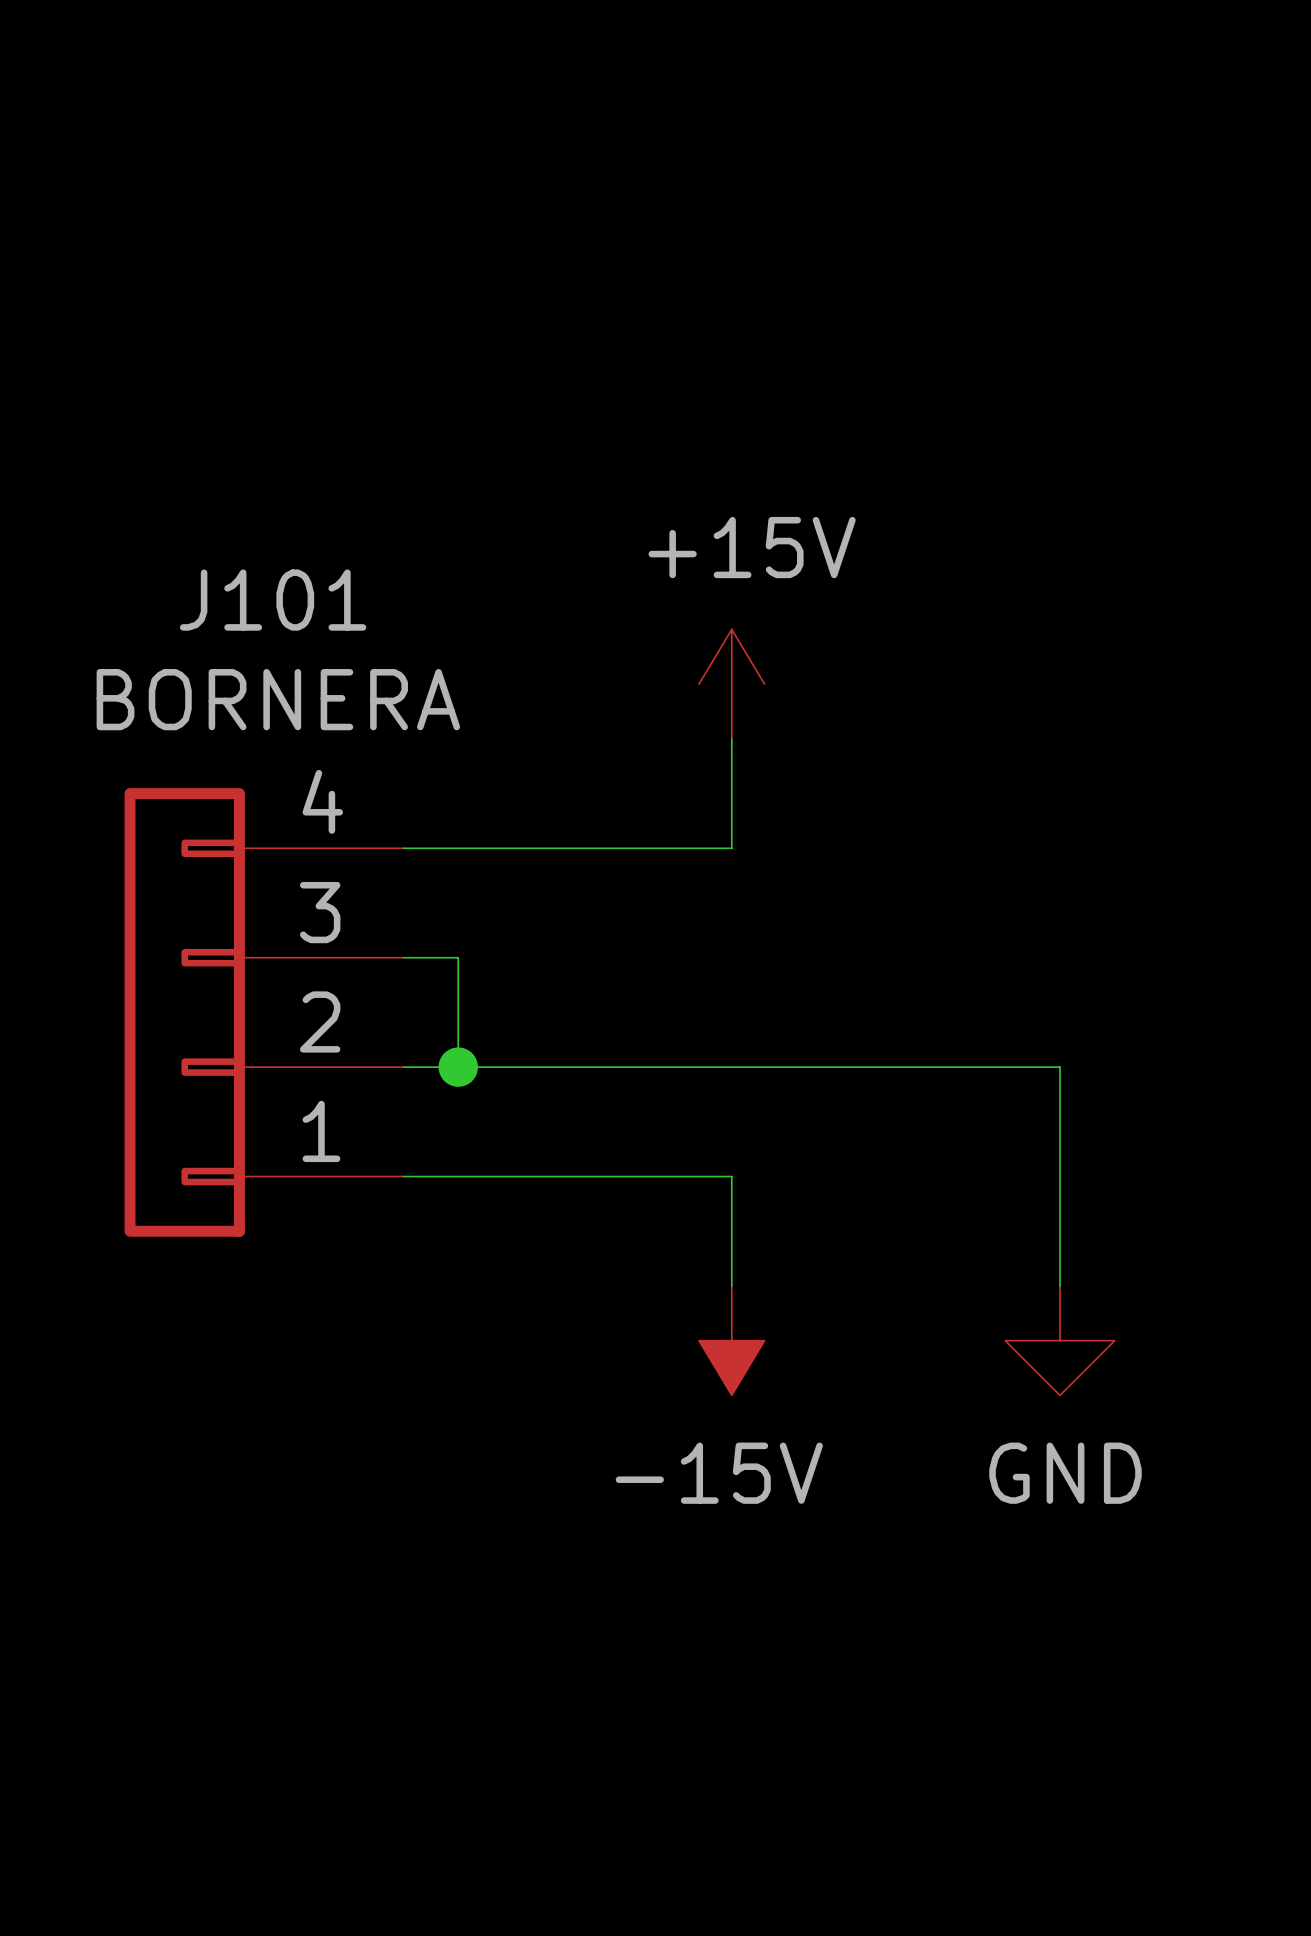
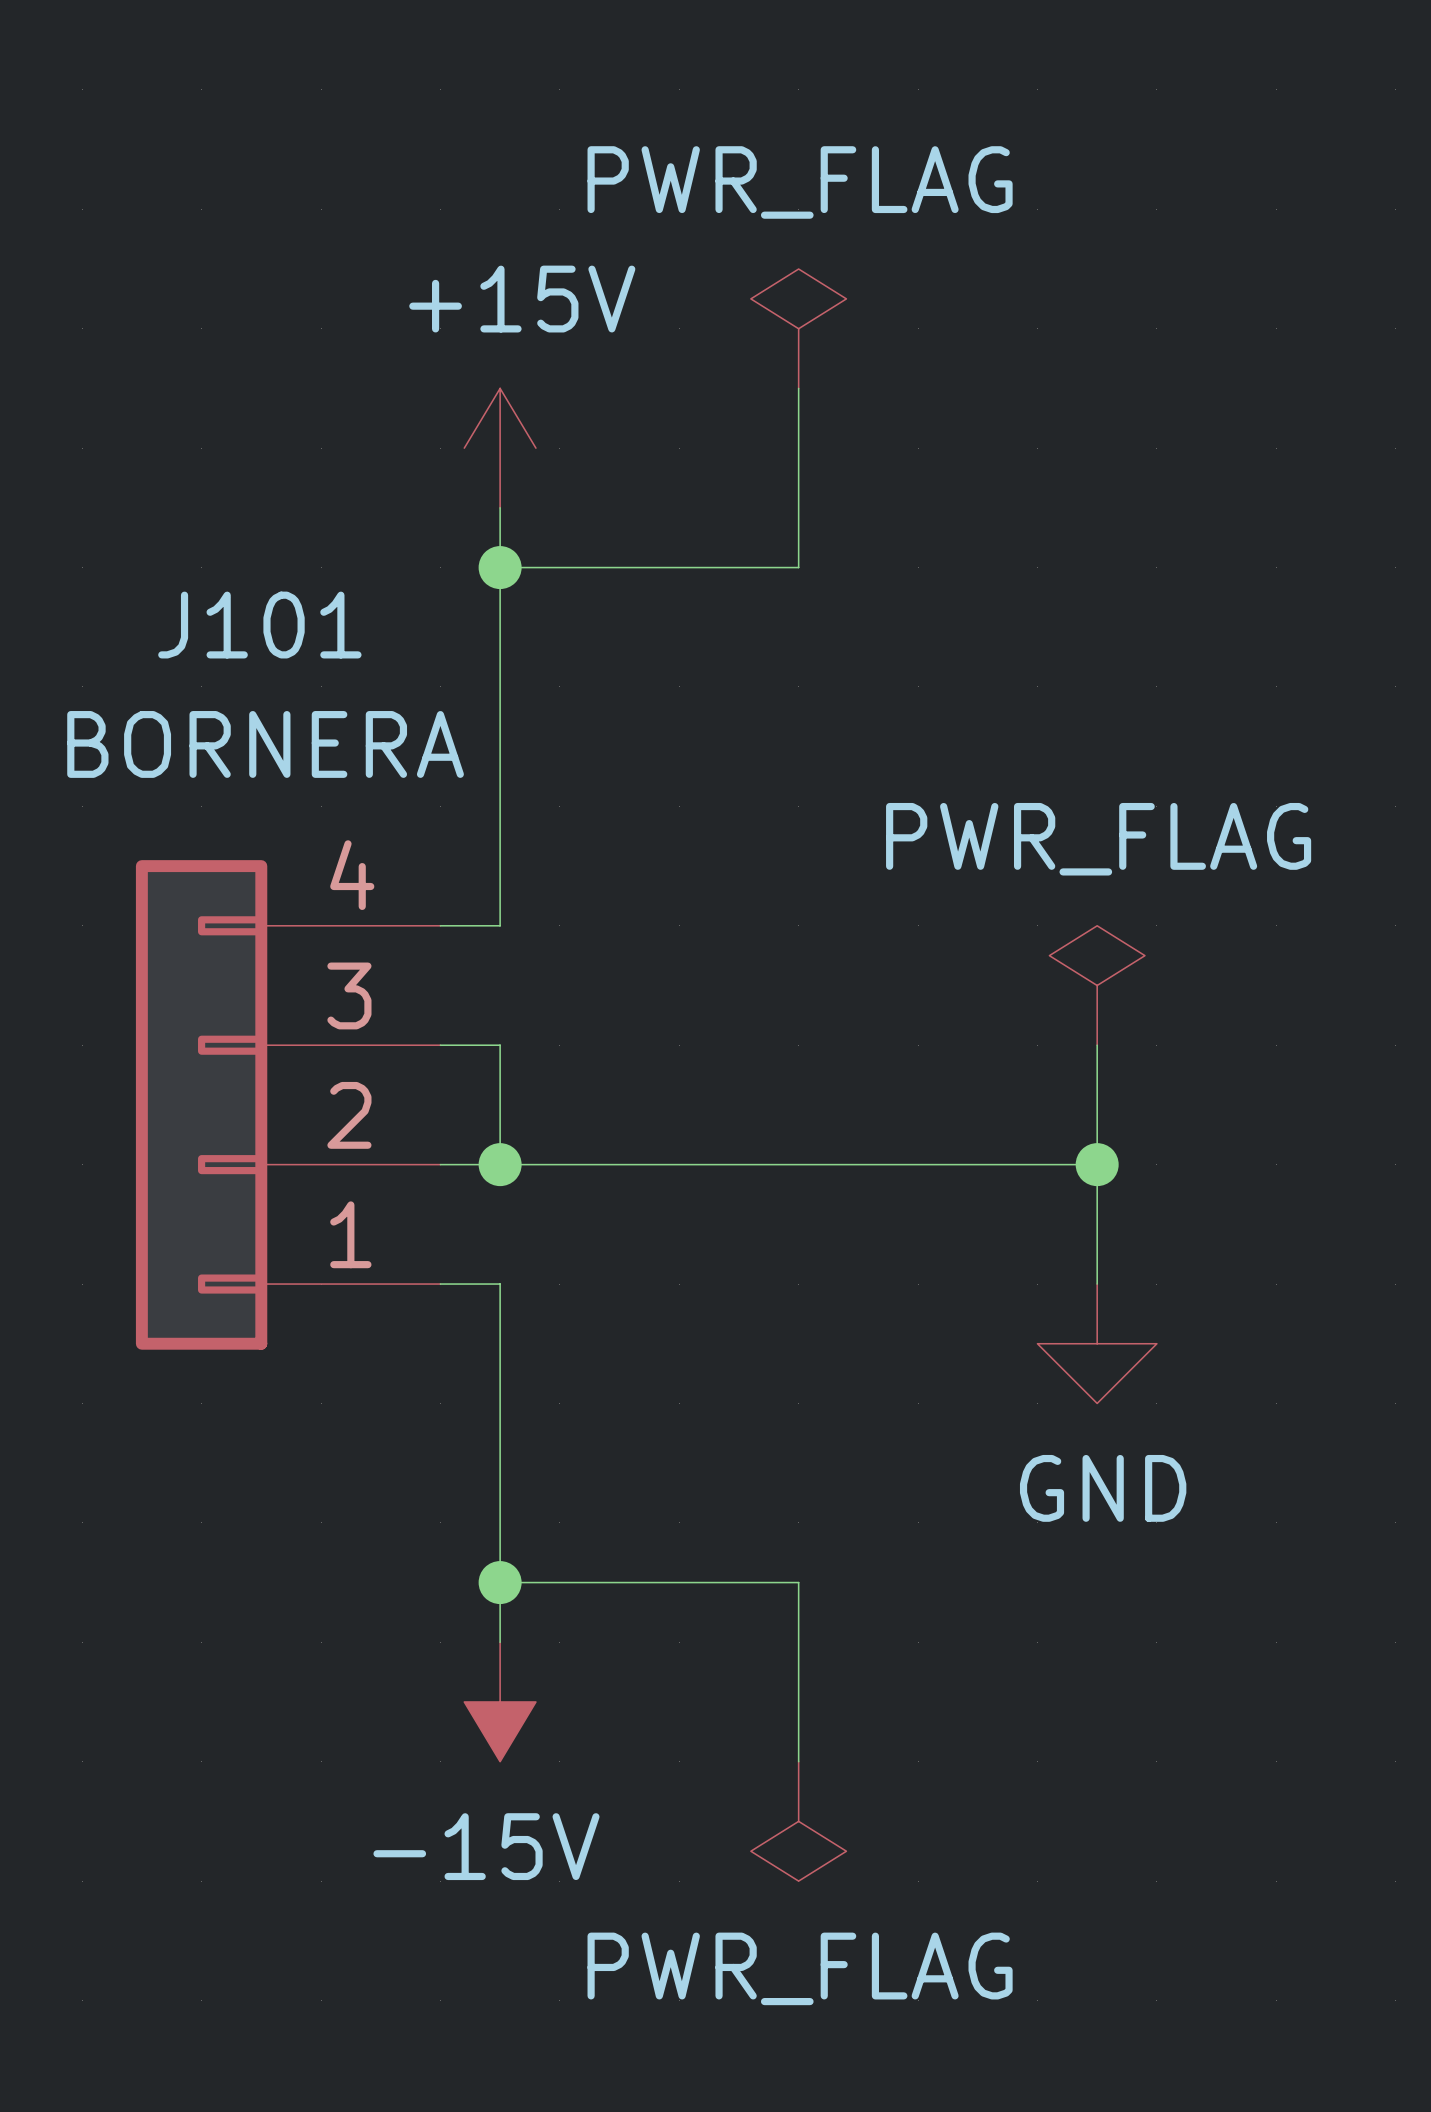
power symbol: none -> PWR_FLAG (798, 328)
wire: none -> (798, 388) (798, 567) (500, 567)
junction: none -> (500, 567)
J101 name position: J101 (273, 600) -> J101 (259, 625)
power symbol position: +15V (731, 684) -> +15V (500, 448)
J101 value position: BORNERA (278, 699) -> BORNERA (265, 744)
wire: (731, 738) (731, 848) (458, 848) -> (500, 507) (500, 925)
power symbol: none -> PWR_FLAG (1097, 985)
wire: none -> (1097, 1045) (1097, 1284)
wire: (1005, 1067) (1060, 1067) (1060, 1285) -> none
junction: none -> (1097, 1164)
wire: (458, 1176) (731, 1176) (731, 1285) -> (500, 1284) (500, 1642)
power symbol position: -15V (731, 1340) -> -15V (500, 1701)
power symbol position: GND (1060, 1340) -> GND (1097, 1343)
wire: none -> (500, 1582) (798, 1582) (798, 1761)
junction: none -> (500, 1582)
power symbol: none -> PWR_FLAG (798, 1821)

